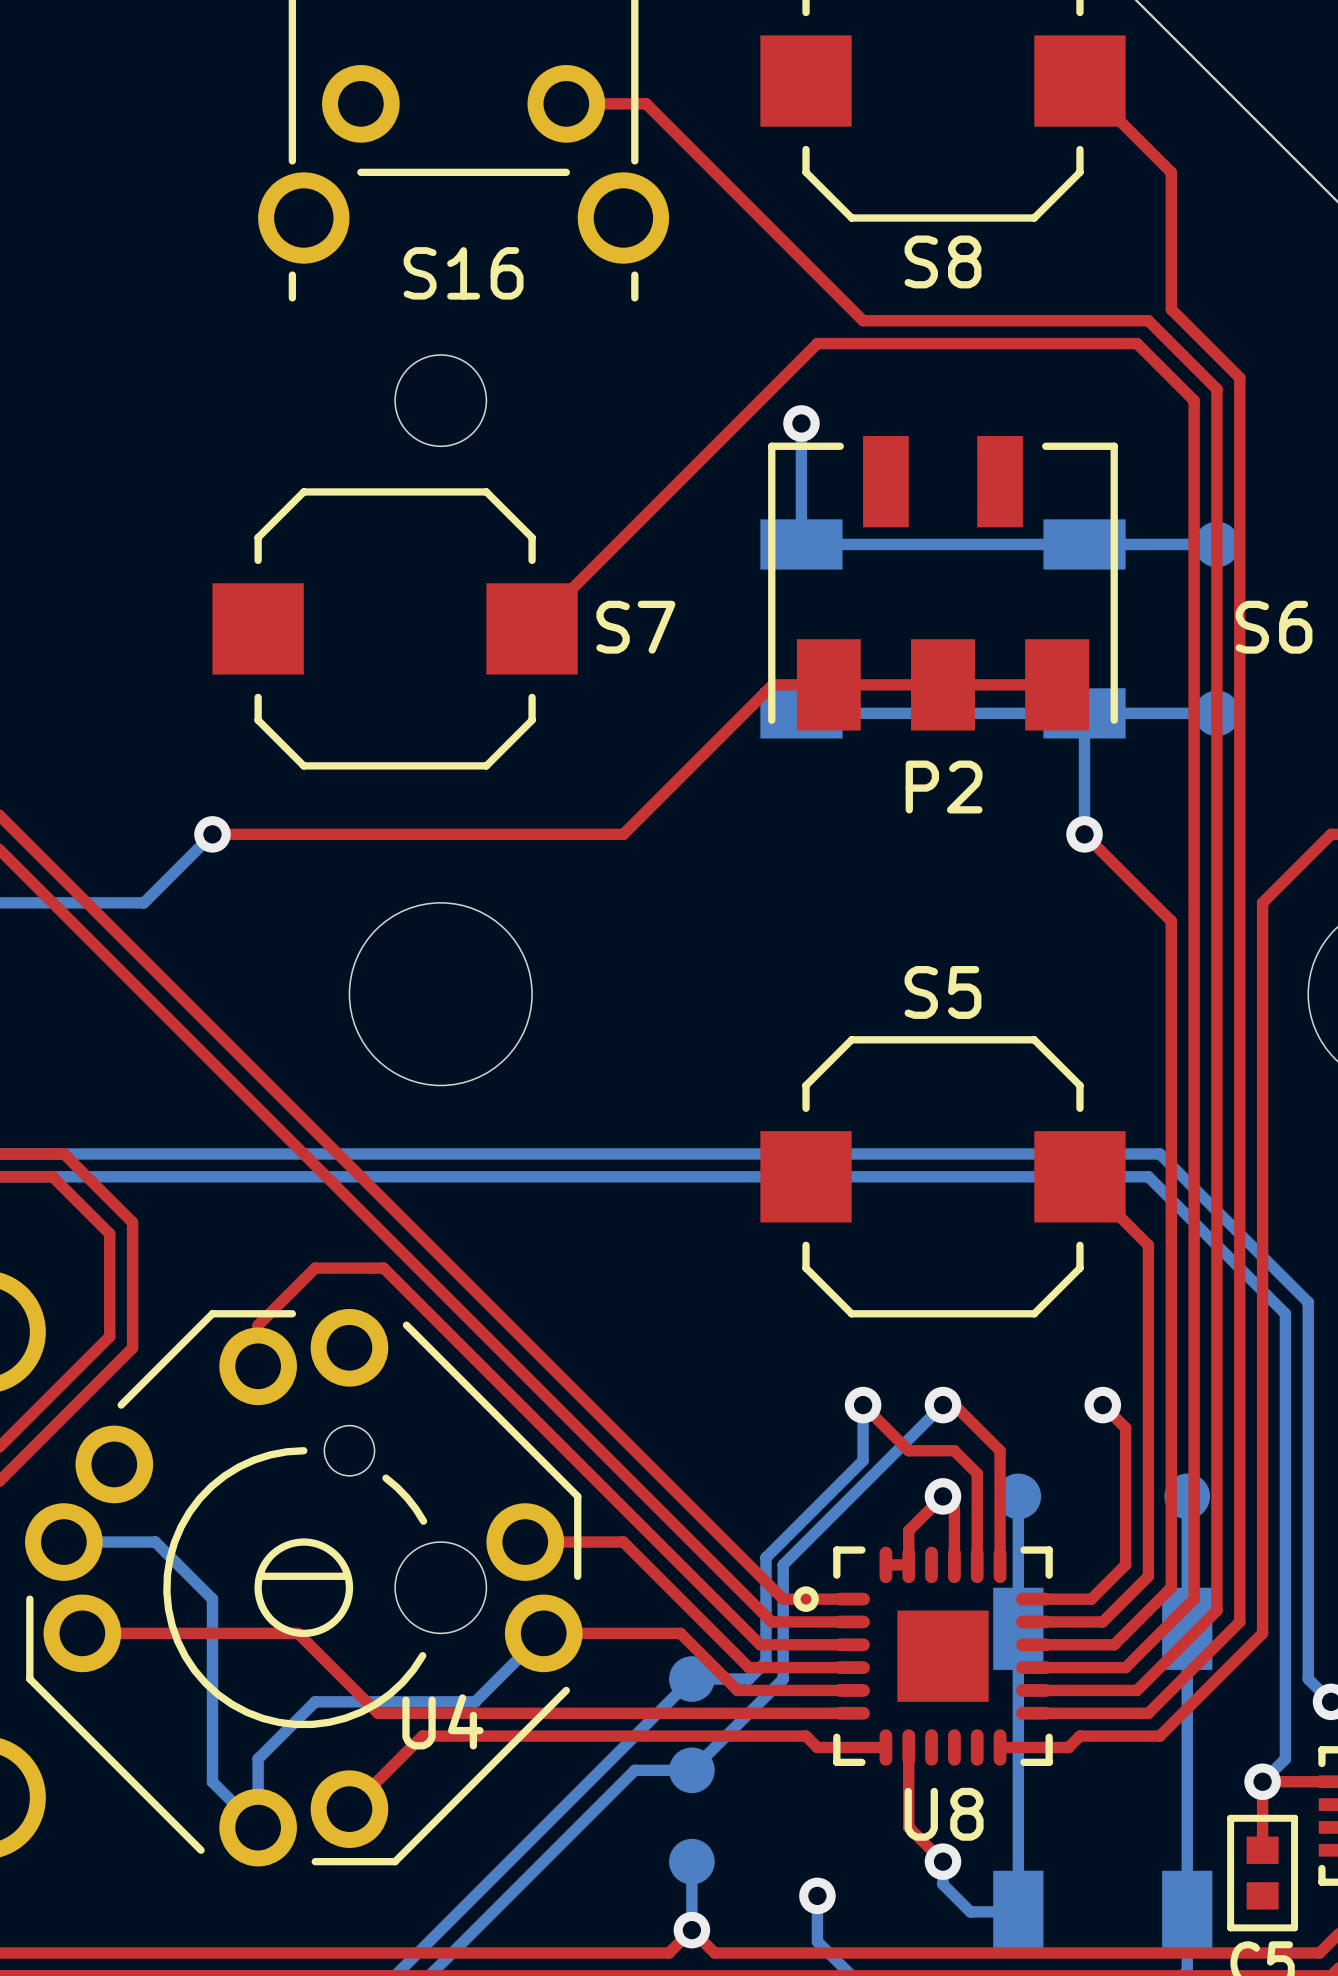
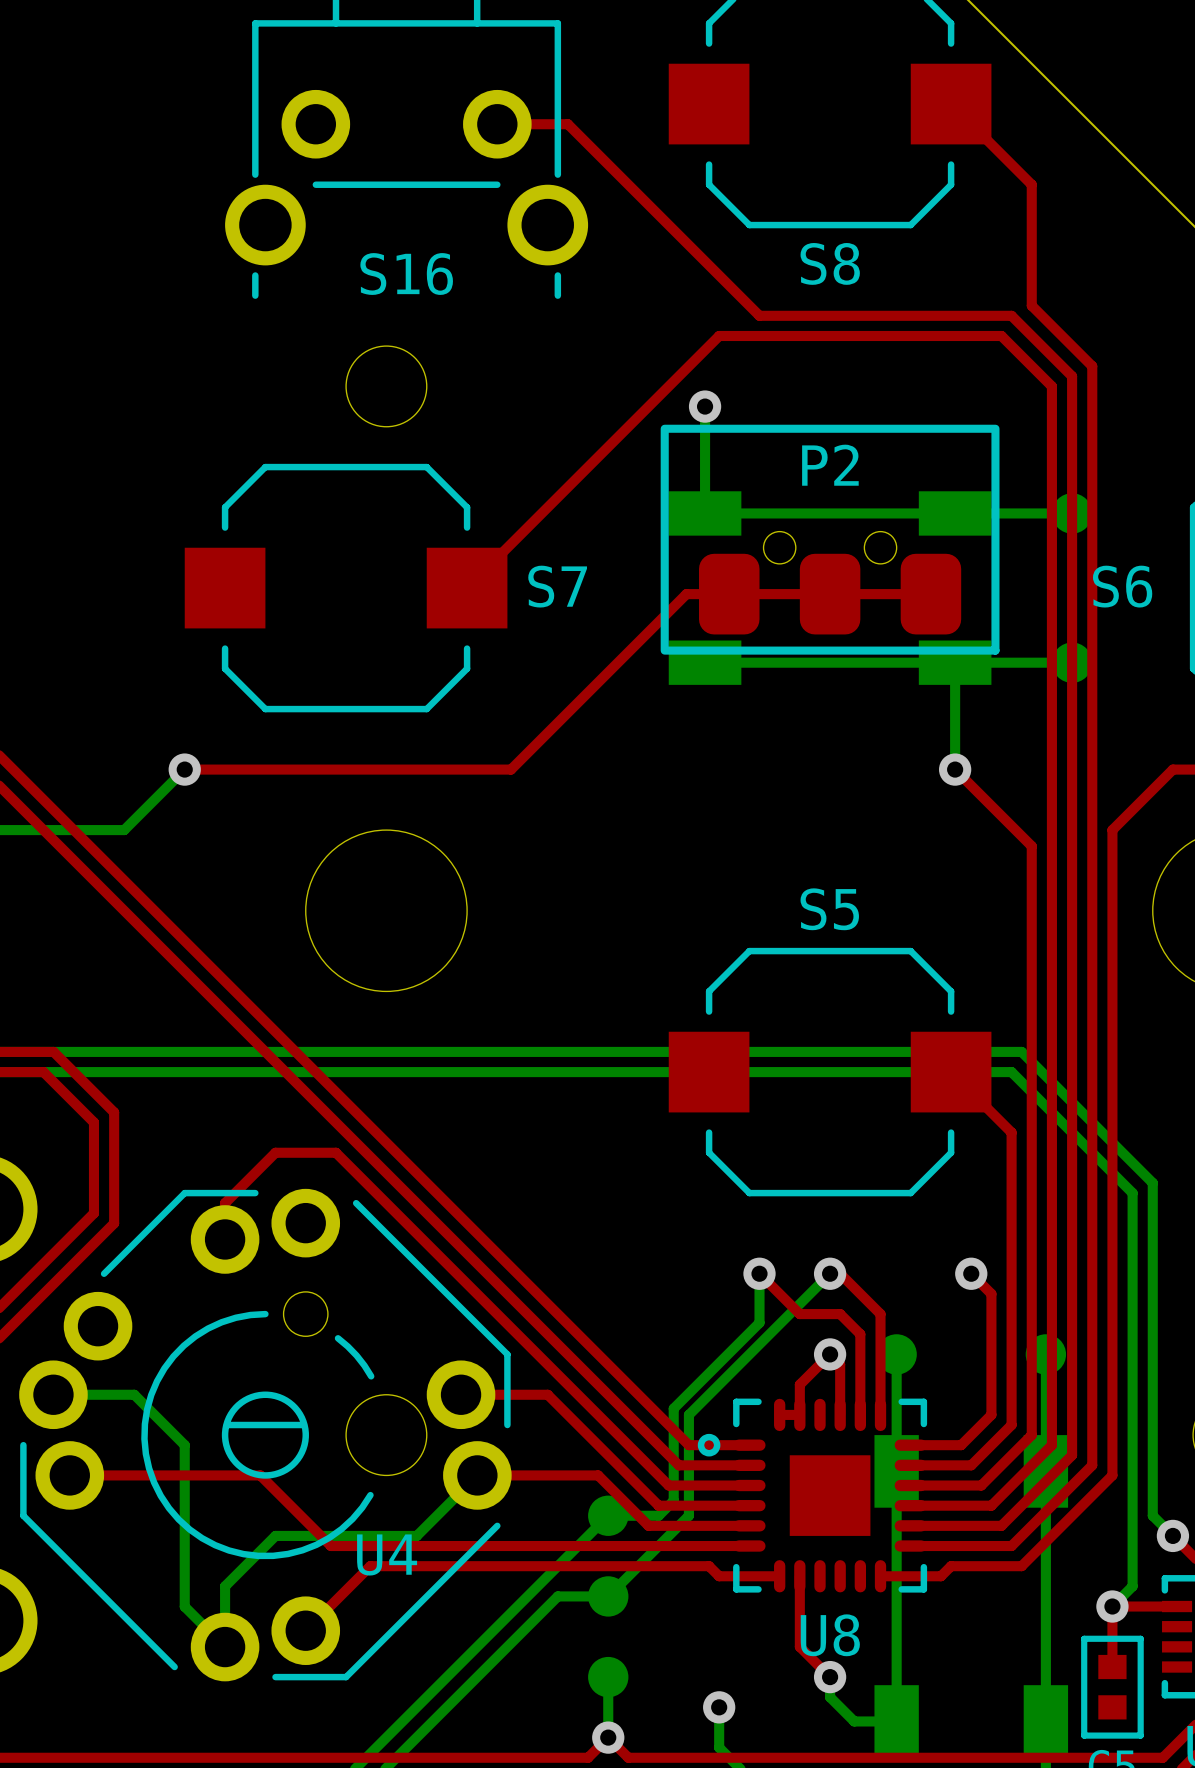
P2 footprint: [768, 436, 1118, 731] -> [660, 424, 1000, 655]
top track: (1057, 684) (772, 684) (623, 834) (581, 834) -> (930, 594) (686, 594) (511, 769)
P2 name position: P2 (944, 787) -> P2 (830, 465)

